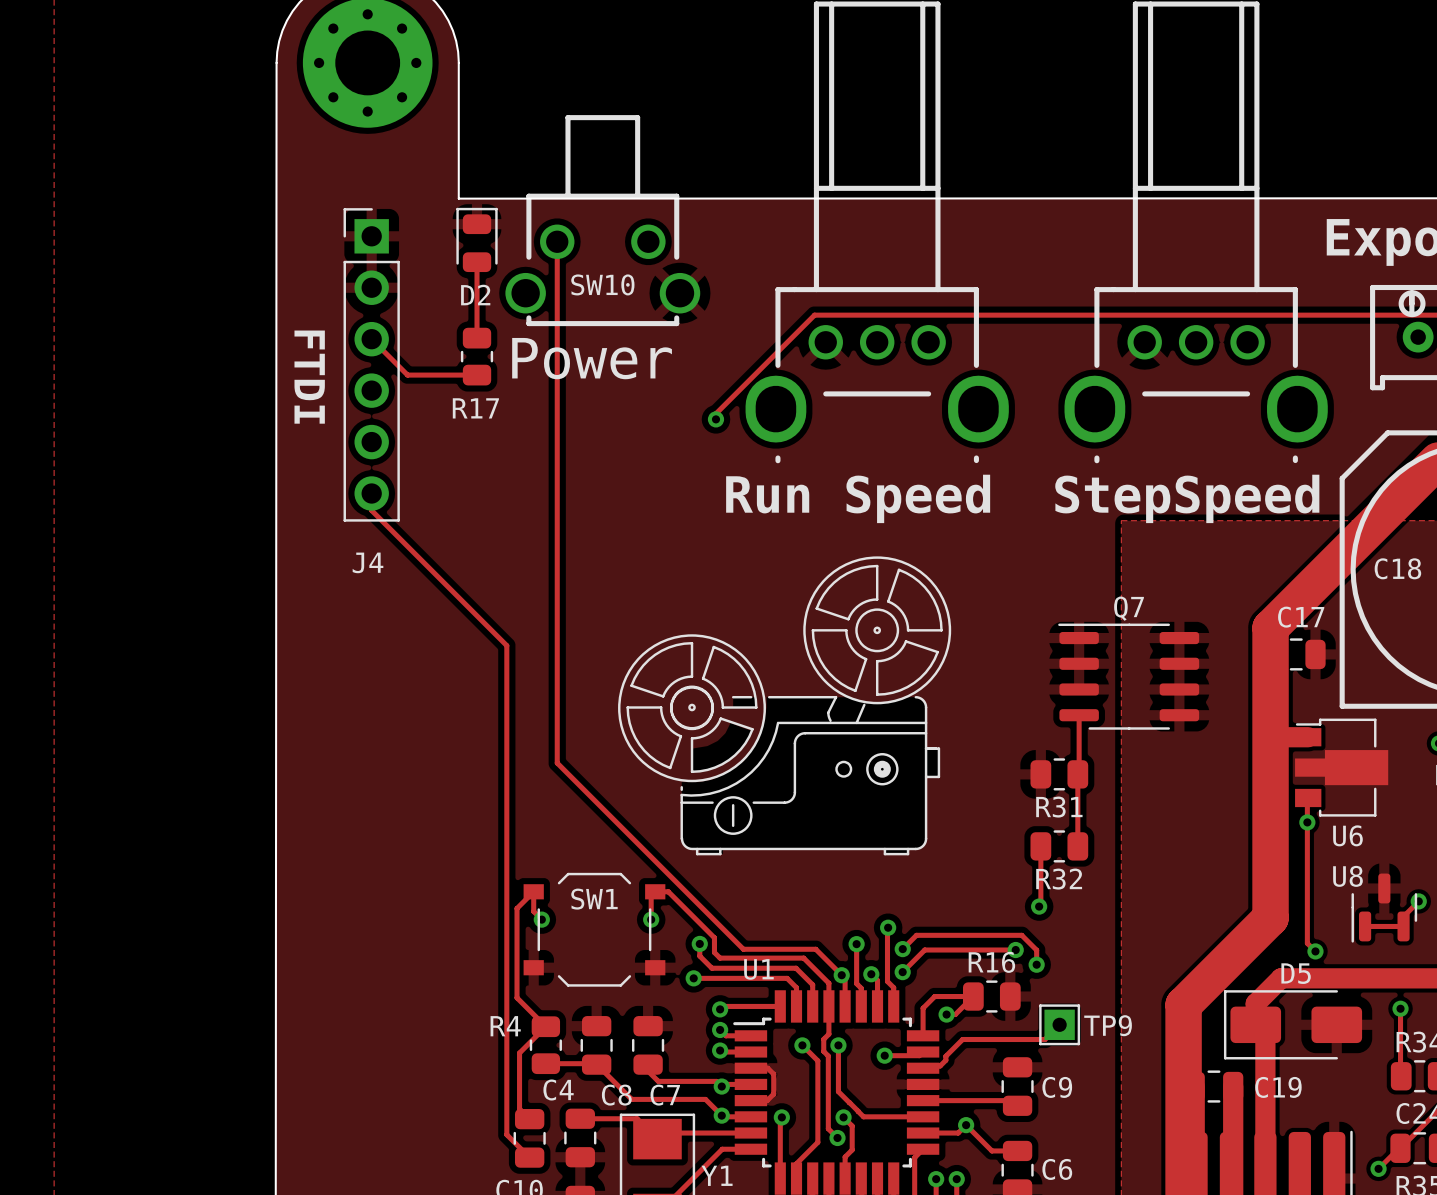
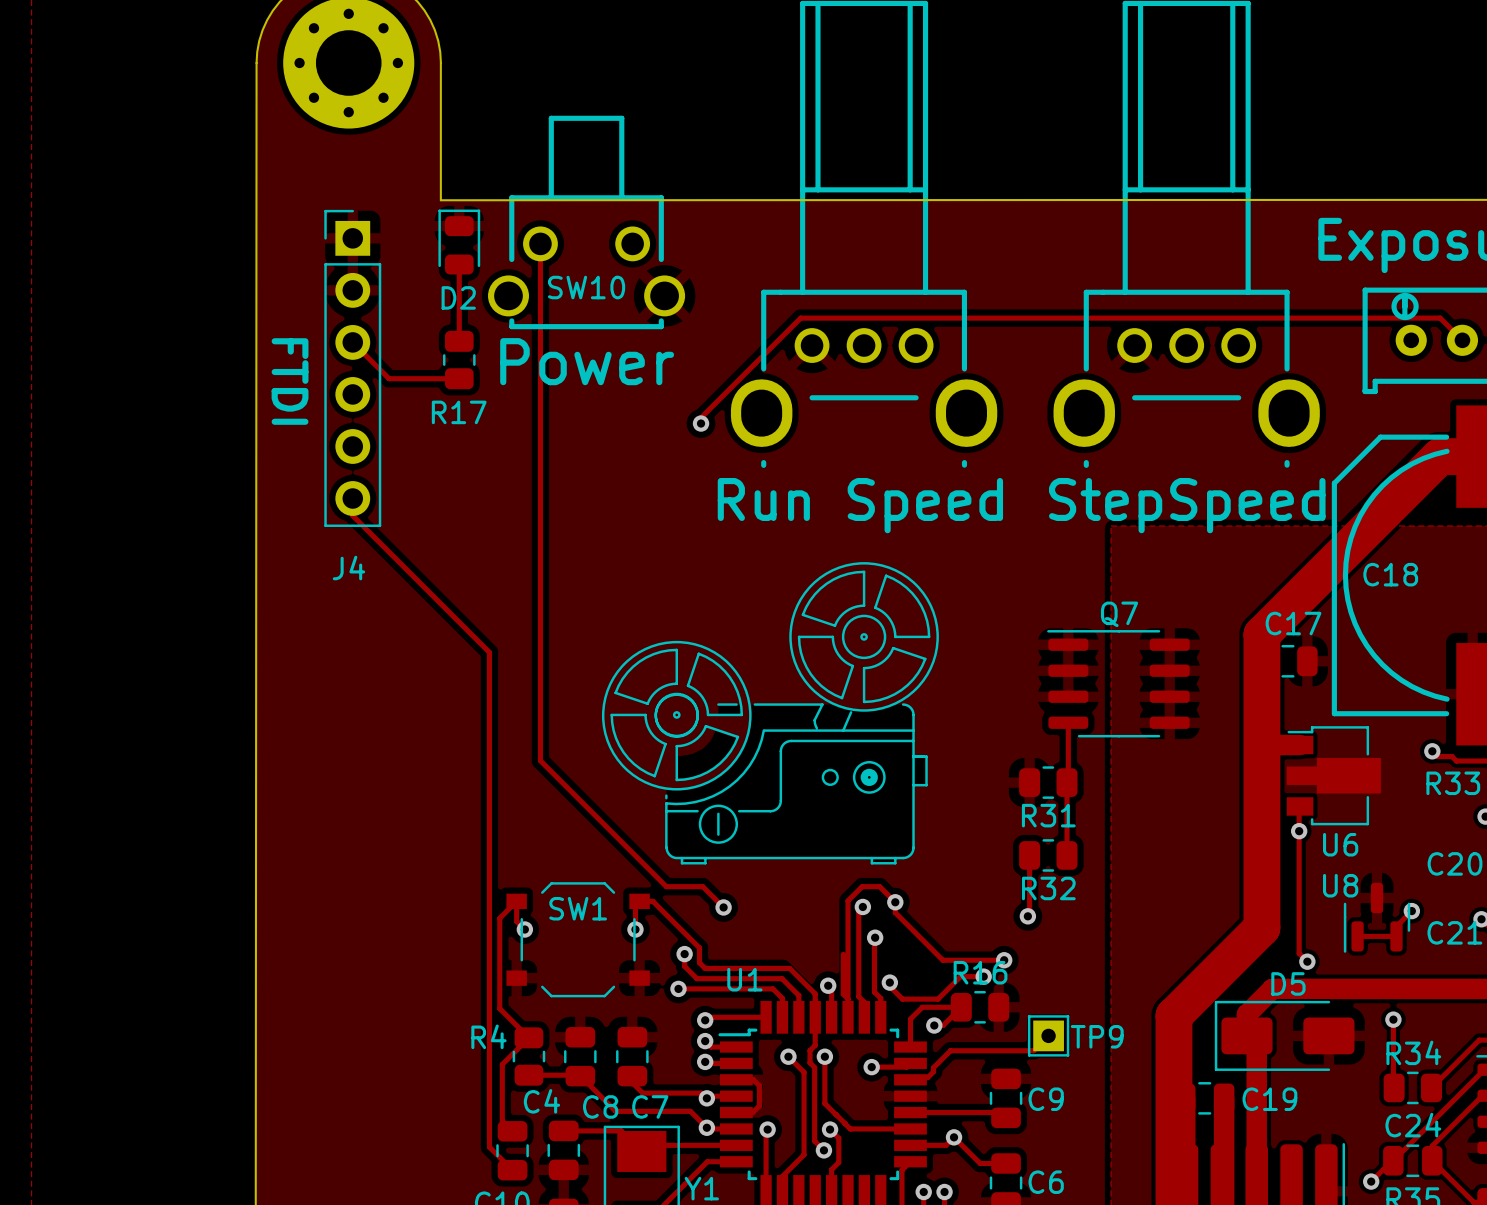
track: (557, 752) (557, 763) (743, 949) (815, 949) (841, 975) -> (540, 760) (666, 886) (702, 886) (723, 907)
via: none -> (895, 902)
via: none -> (723, 907)
via: none -> (862, 906)
via: (856, 944) -> none
track: (902, 949) (916, 935) (1021, 935) (1036, 950) (1036, 964) -> none
via: (902, 949) -> none
track: (955, 950) (924, 950) (902, 972) -> (942, 960) (895, 912) (895, 902) (879, 886) (862, 886) (848, 900) (848, 999)
via position: (1036, 964) -> (983, 976)
track: none -> (983, 976) (960, 976) (938, 999) (902, 999) (886, 983)
track: (871, 974) (877, 980) (877, 991) -> (862, 906) (858, 911) (858, 996) (864, 1002)
via: (871, 974) -> none

